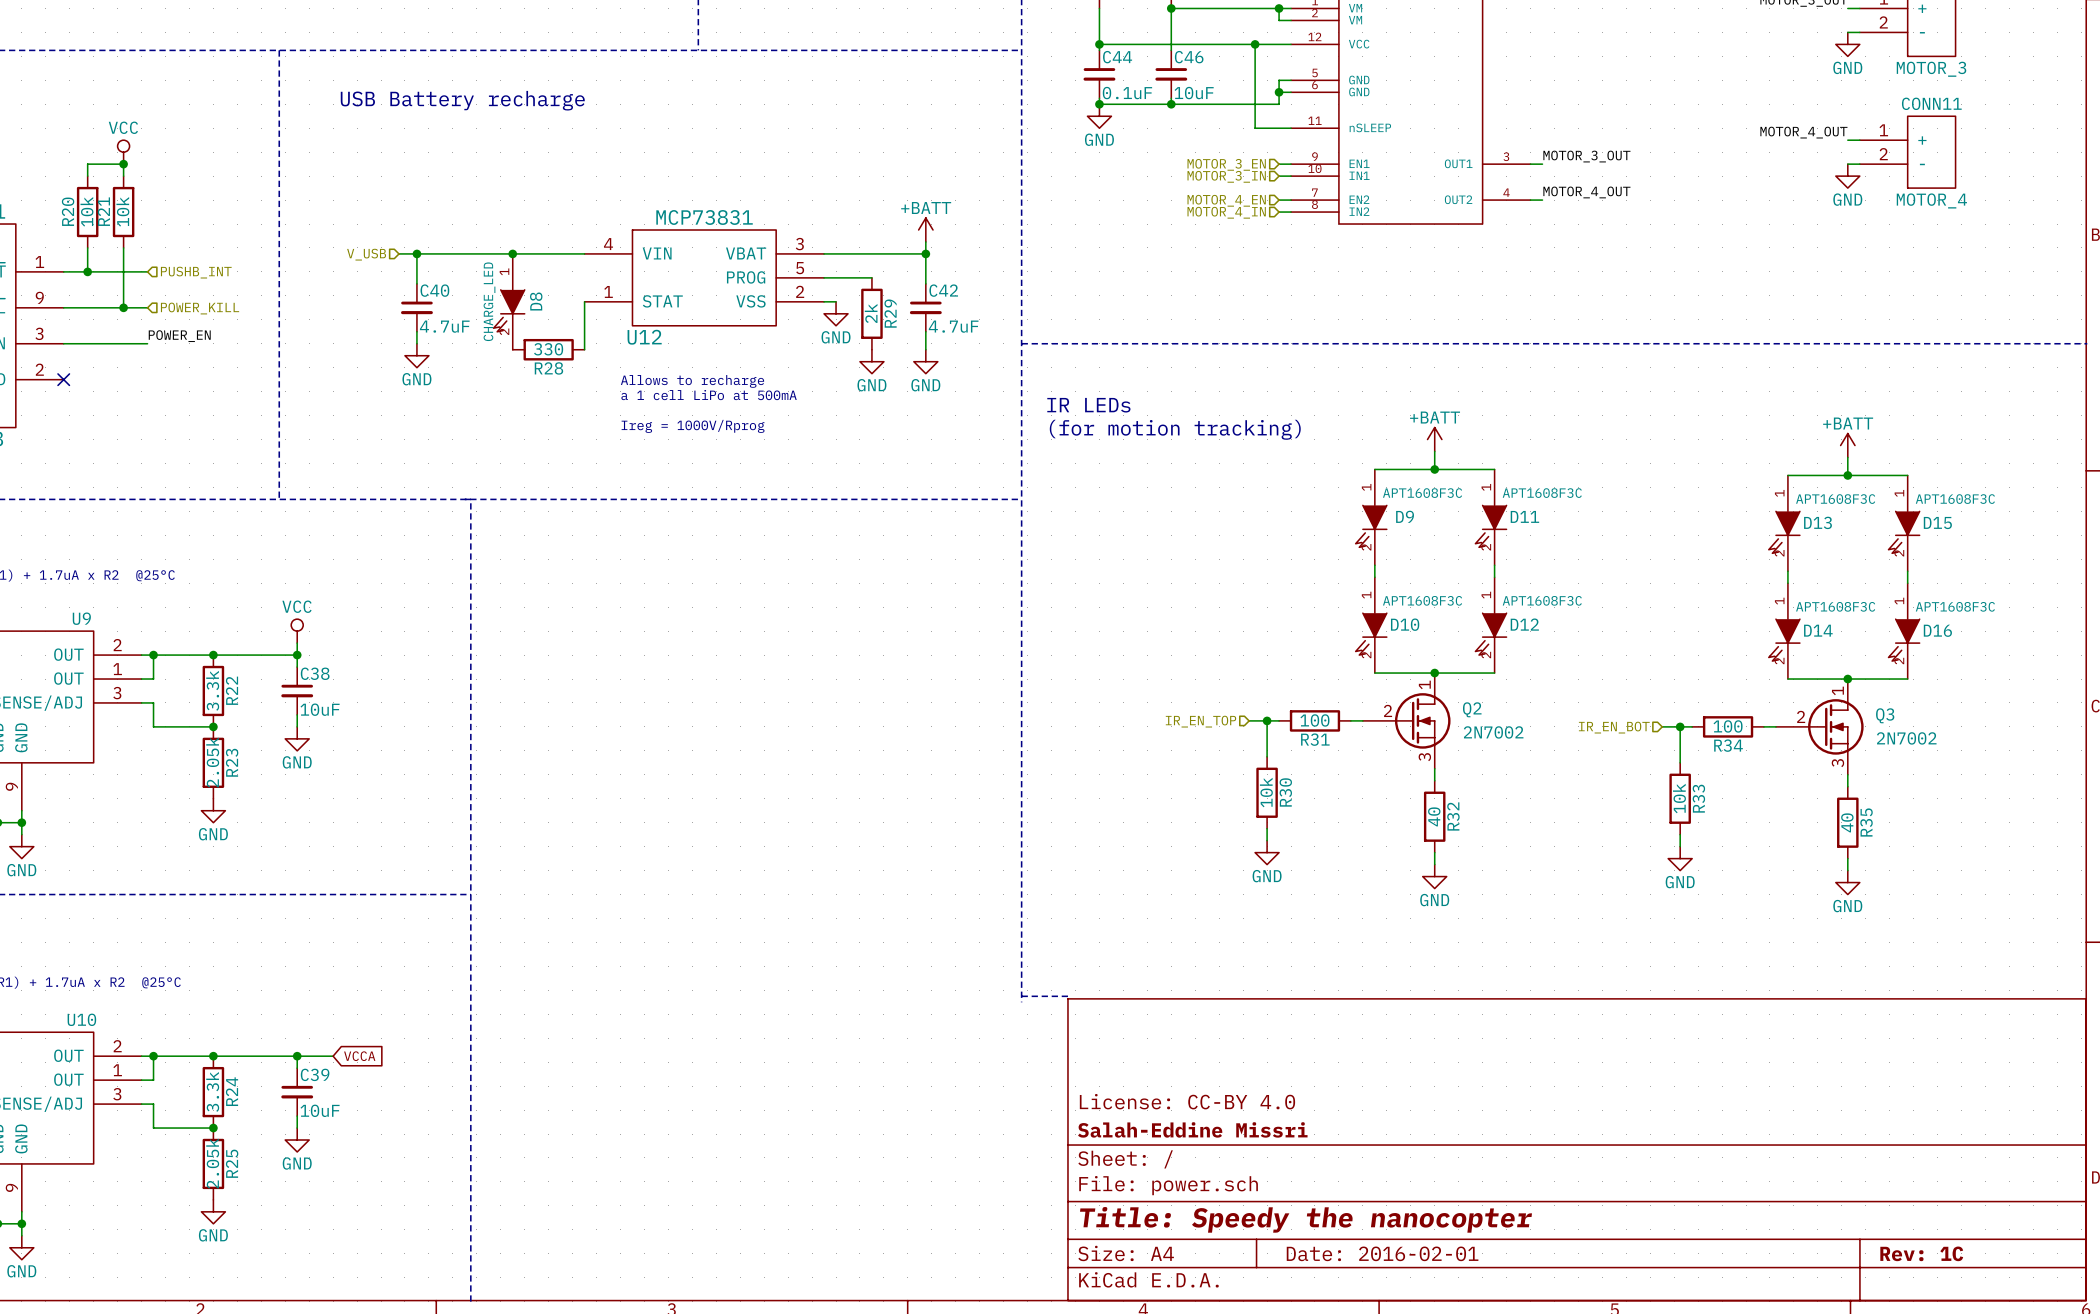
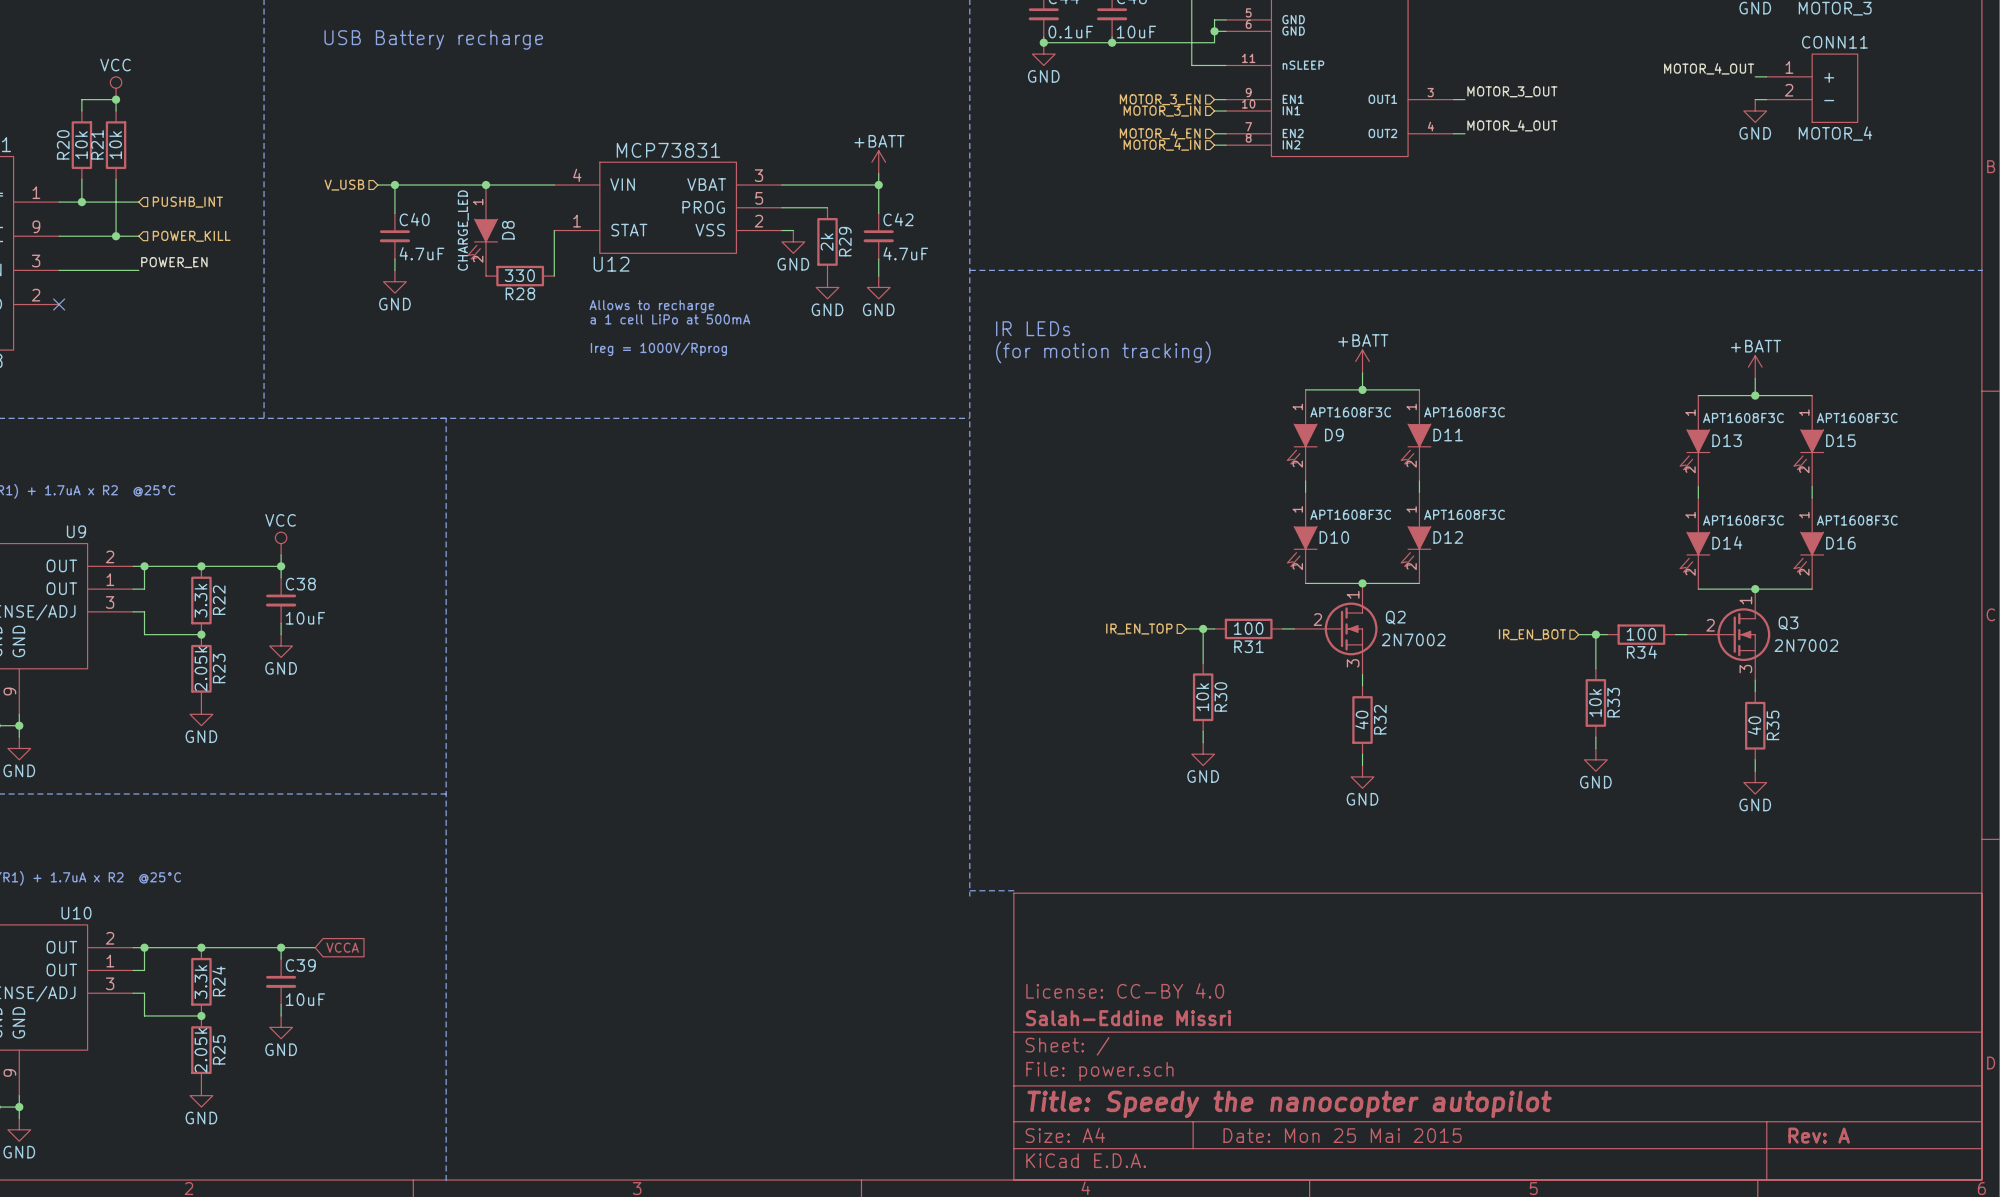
title block: Title: Speedy the nanocopter (1306, 1219) -> Title: Speedy the nanocopter autopilot (1289, 1104)
title block: Date: 2016-02-01 (1382, 1253) -> Date: Mon 25 Mai 2015 (1342, 1135)
title block: Rev: 1C (1921, 1253) -> Rev: A (1819, 1135)

